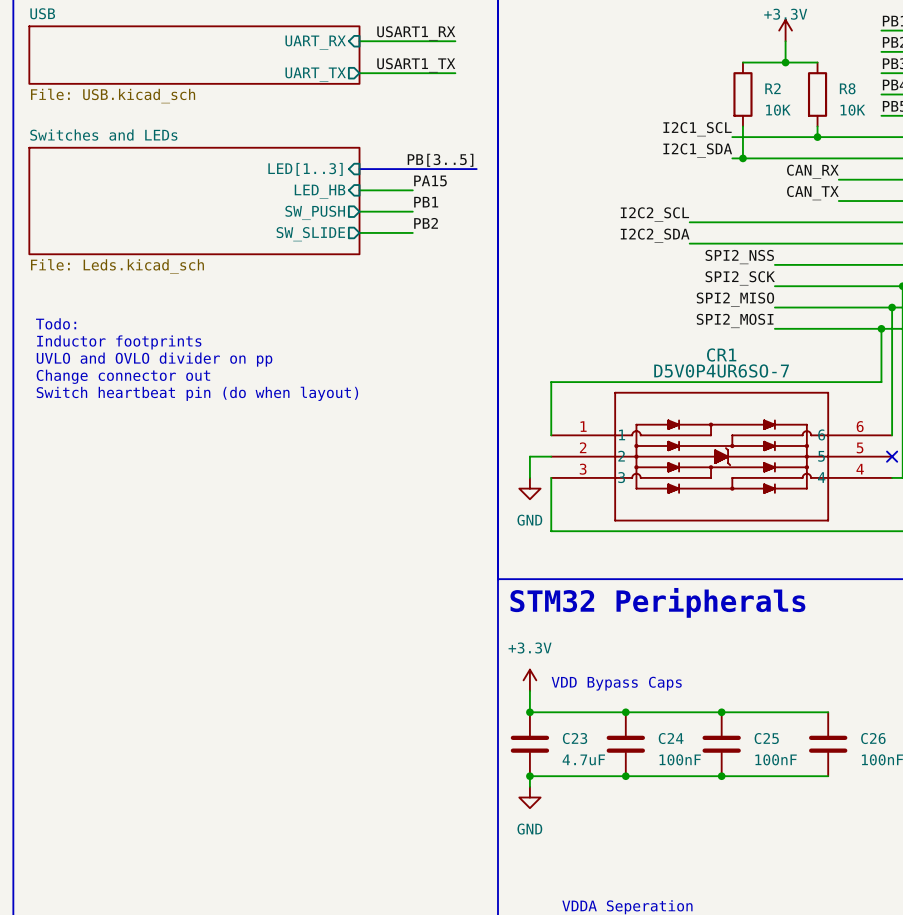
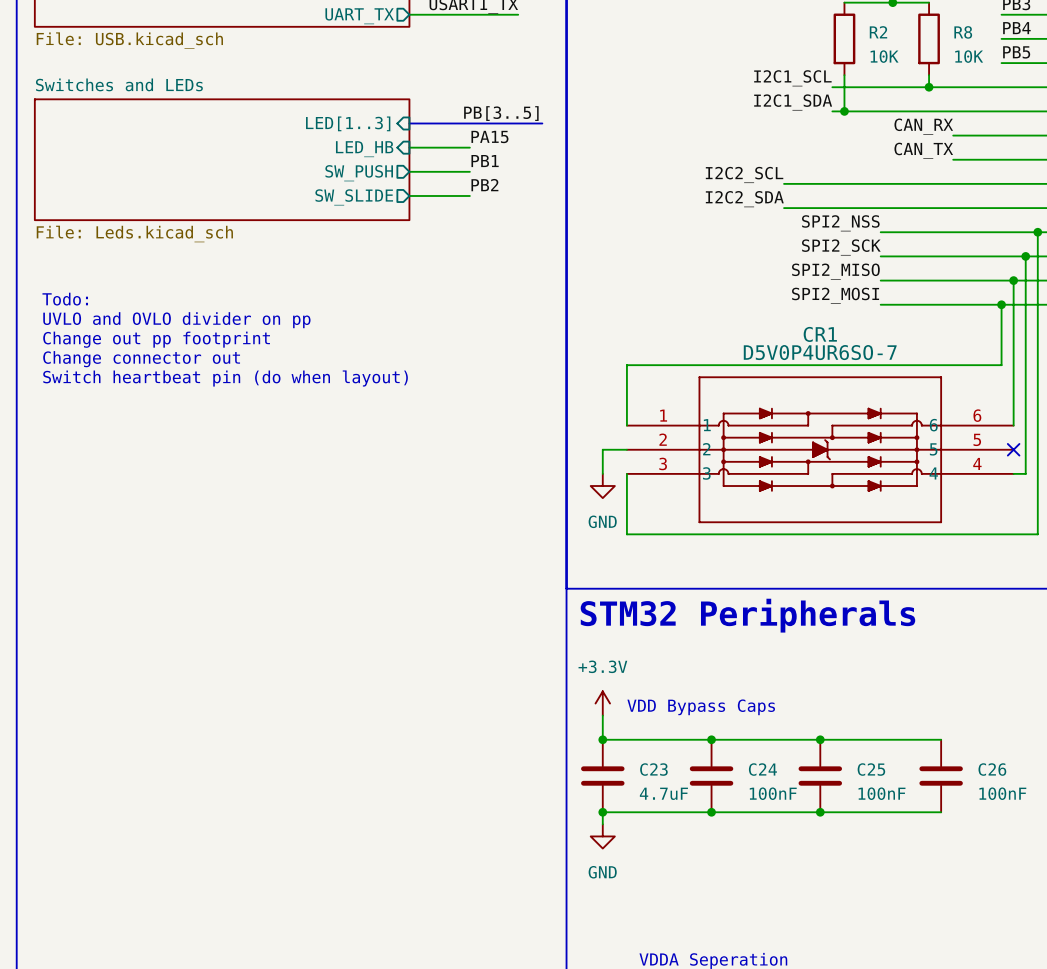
text: Inductor footprints (119, 342) -> UVLO and OVLO divider on pp (176, 320)
text: UVLO and OVLO divider on pp (154, 359) -> Change out pp footprint (156, 339)

